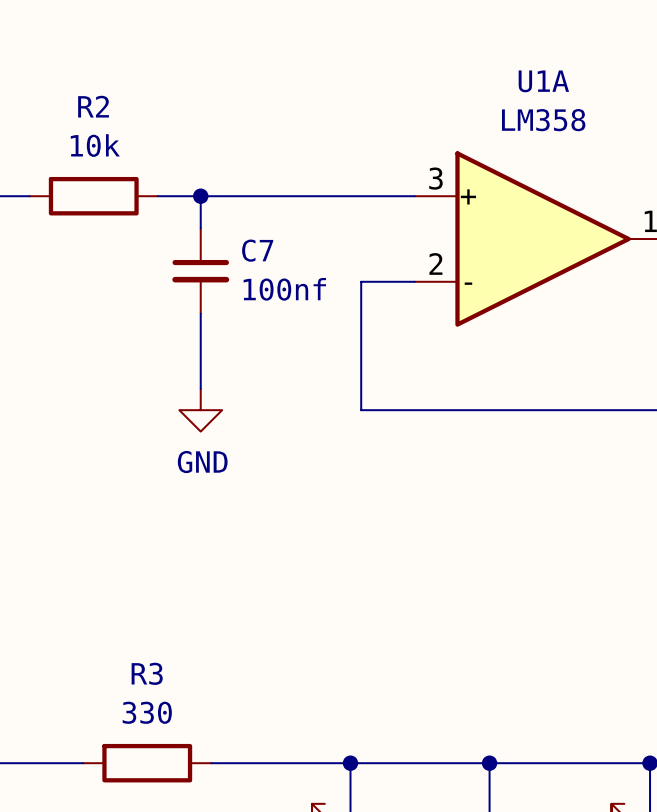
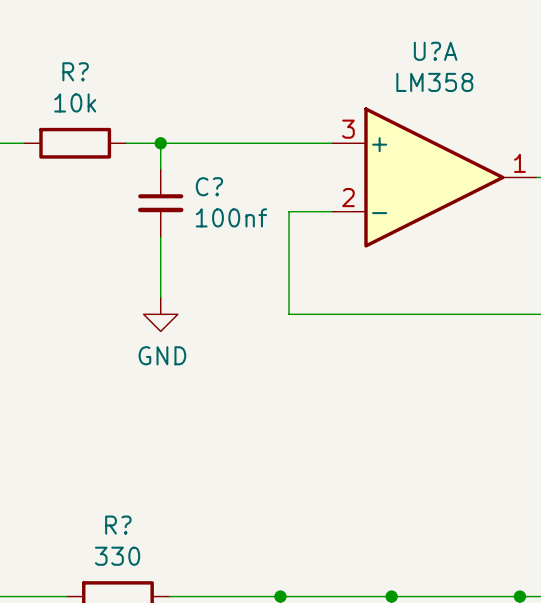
U1A name: U1A (543, 81) -> U?A (435, 51)
R2 name: R2 (93, 106) -> R? (75, 71)
C7 name: C7 (257, 250) -> C? (209, 186)
R3 name: R3 (147, 673) -> R? (118, 525)

